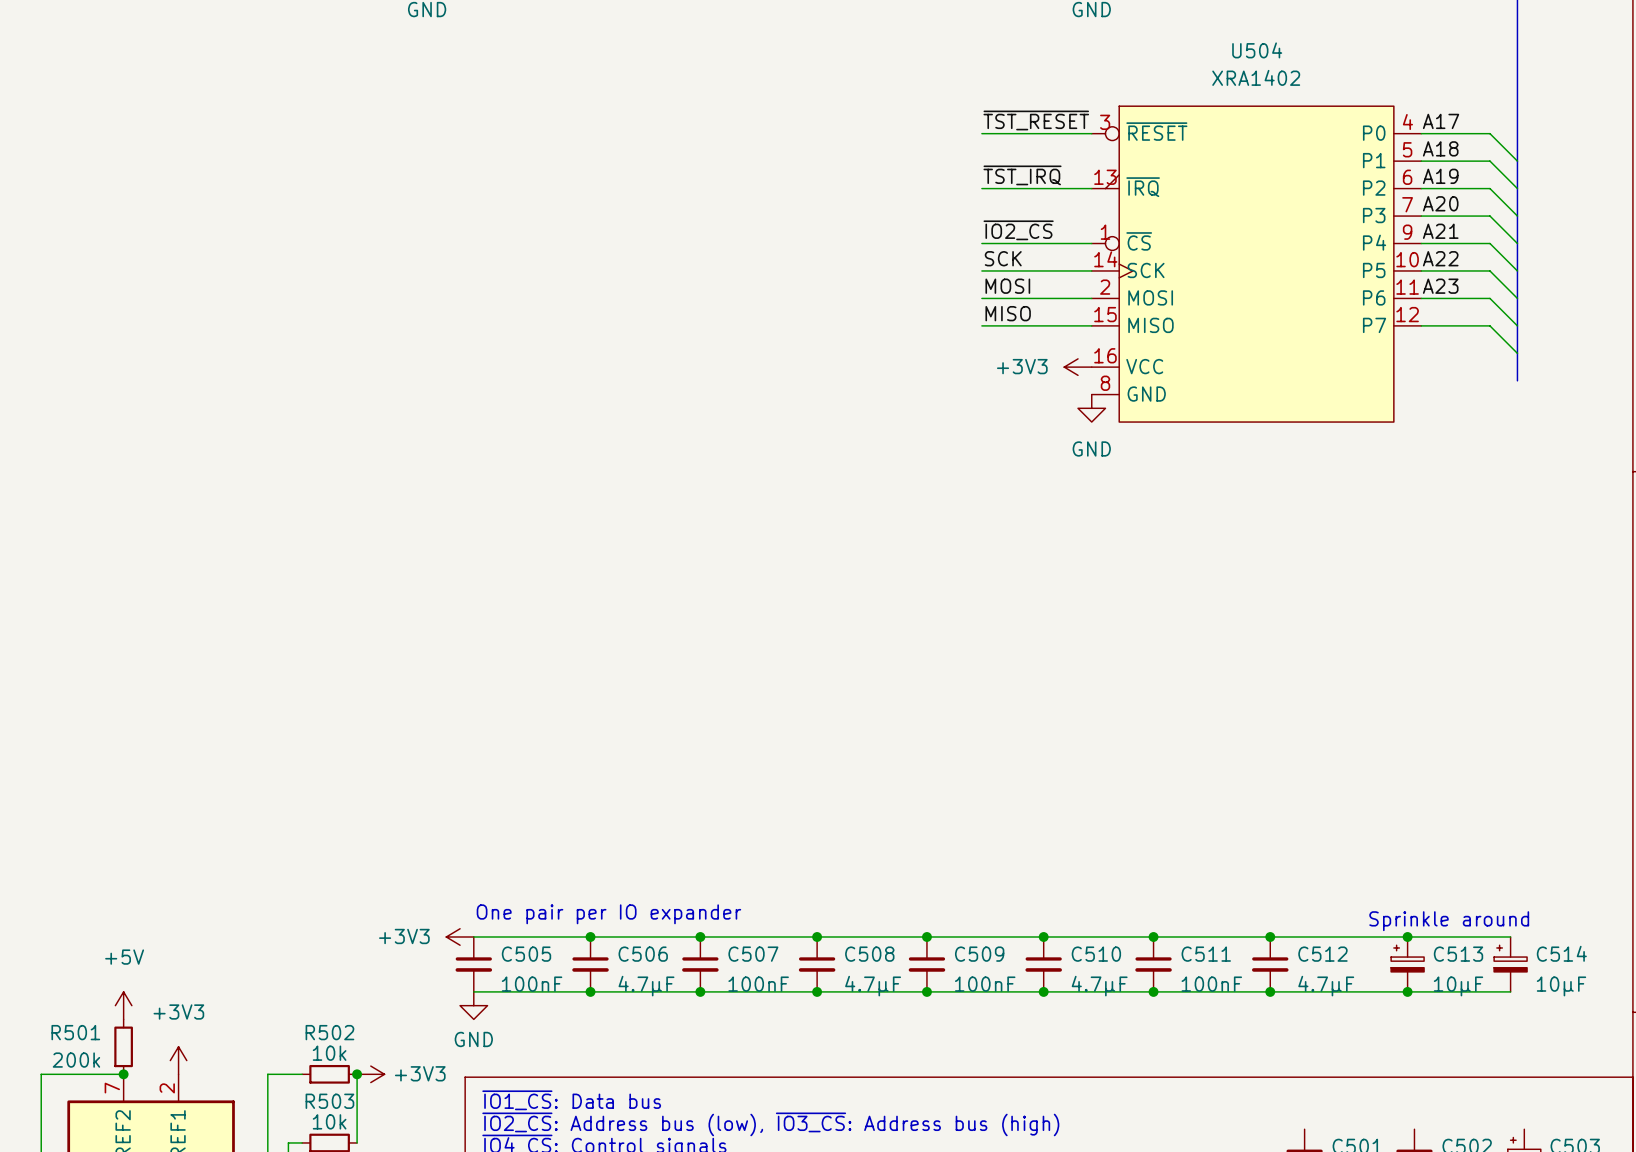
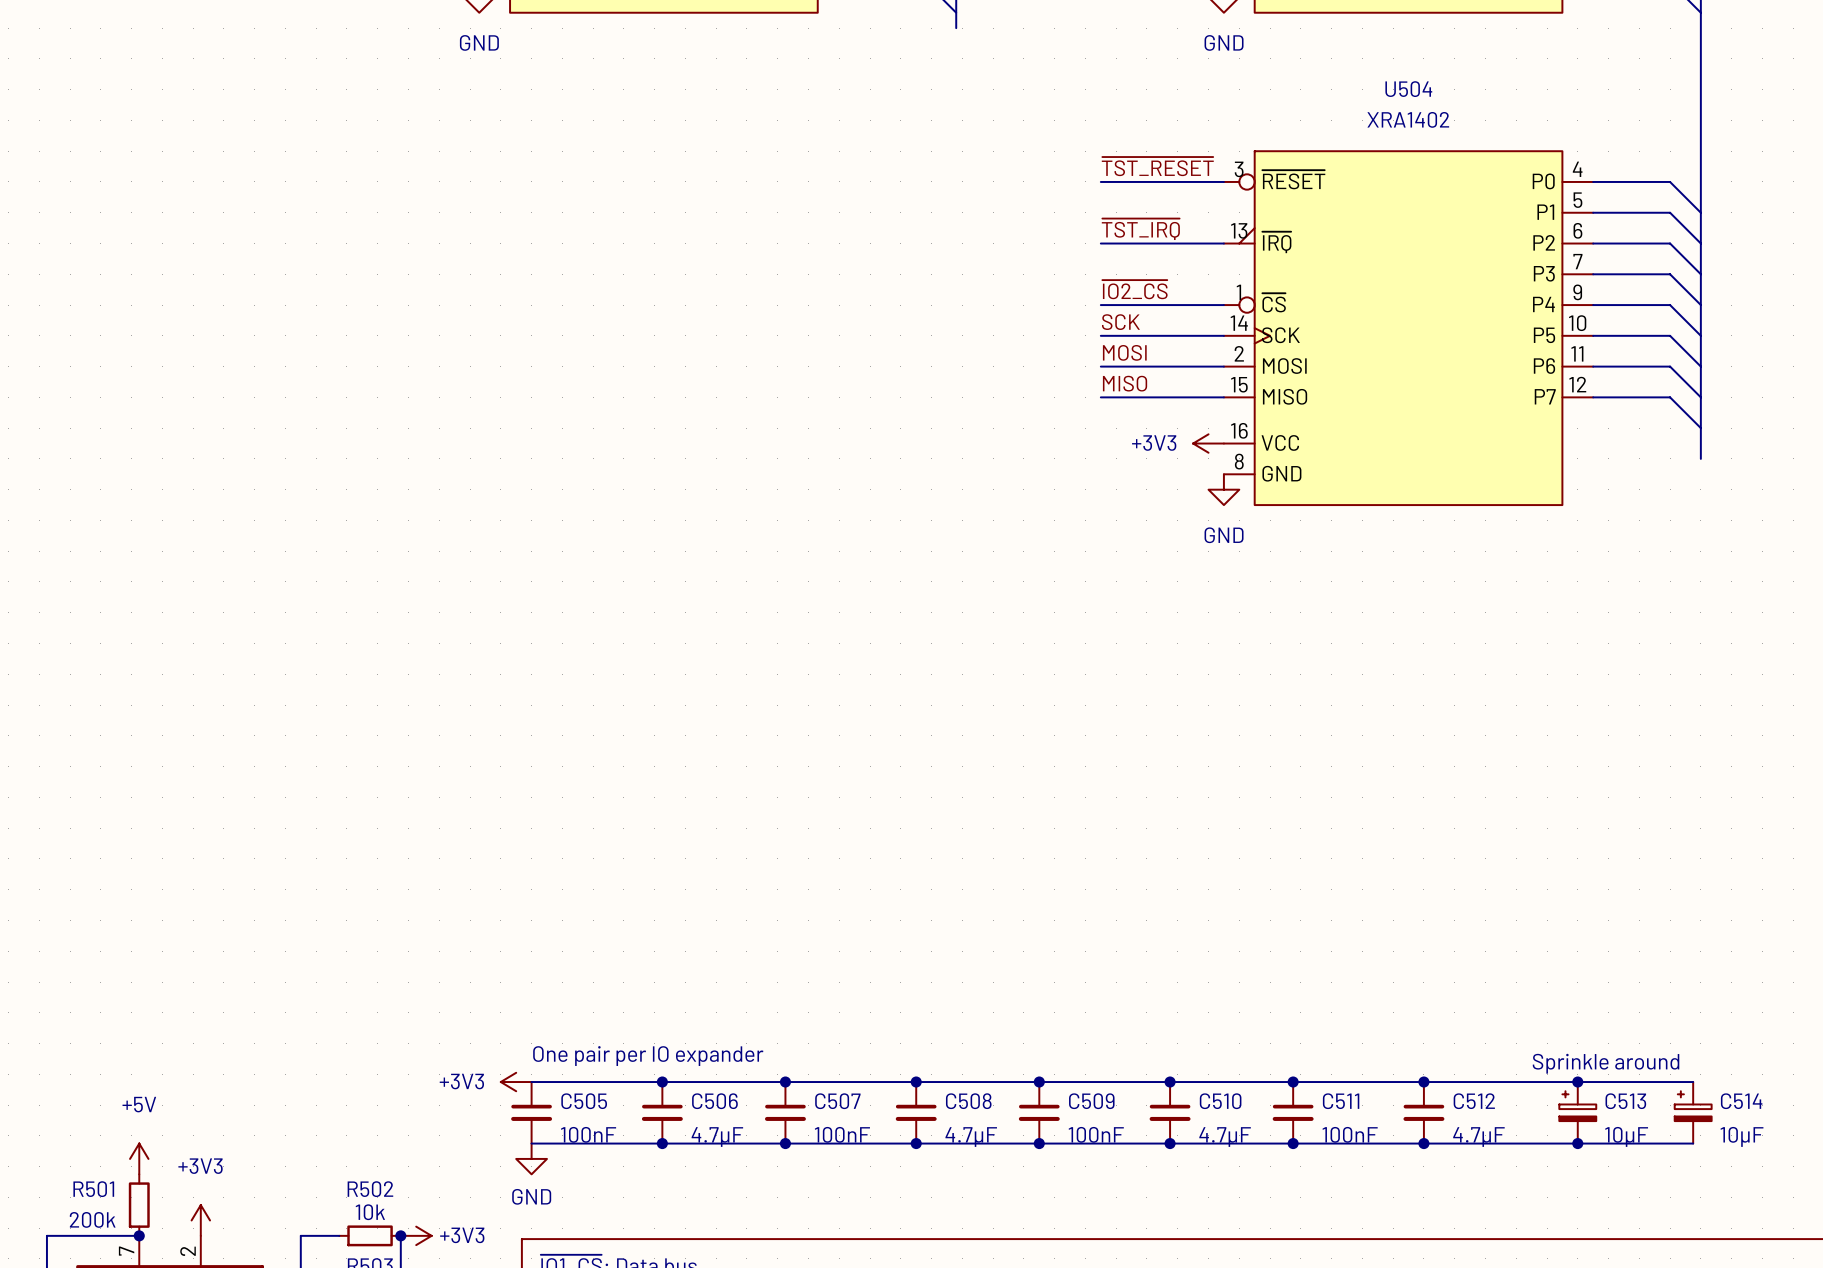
label: A17 (1441, 121) -> none
label: A18 (1440, 148) -> none
label: A19 (1440, 176) -> none
label: A20 (1440, 203) -> none
label: A21 (1440, 231) -> none
label: A22 (1440, 258) -> none
label: A23 (1440, 286) -> none

